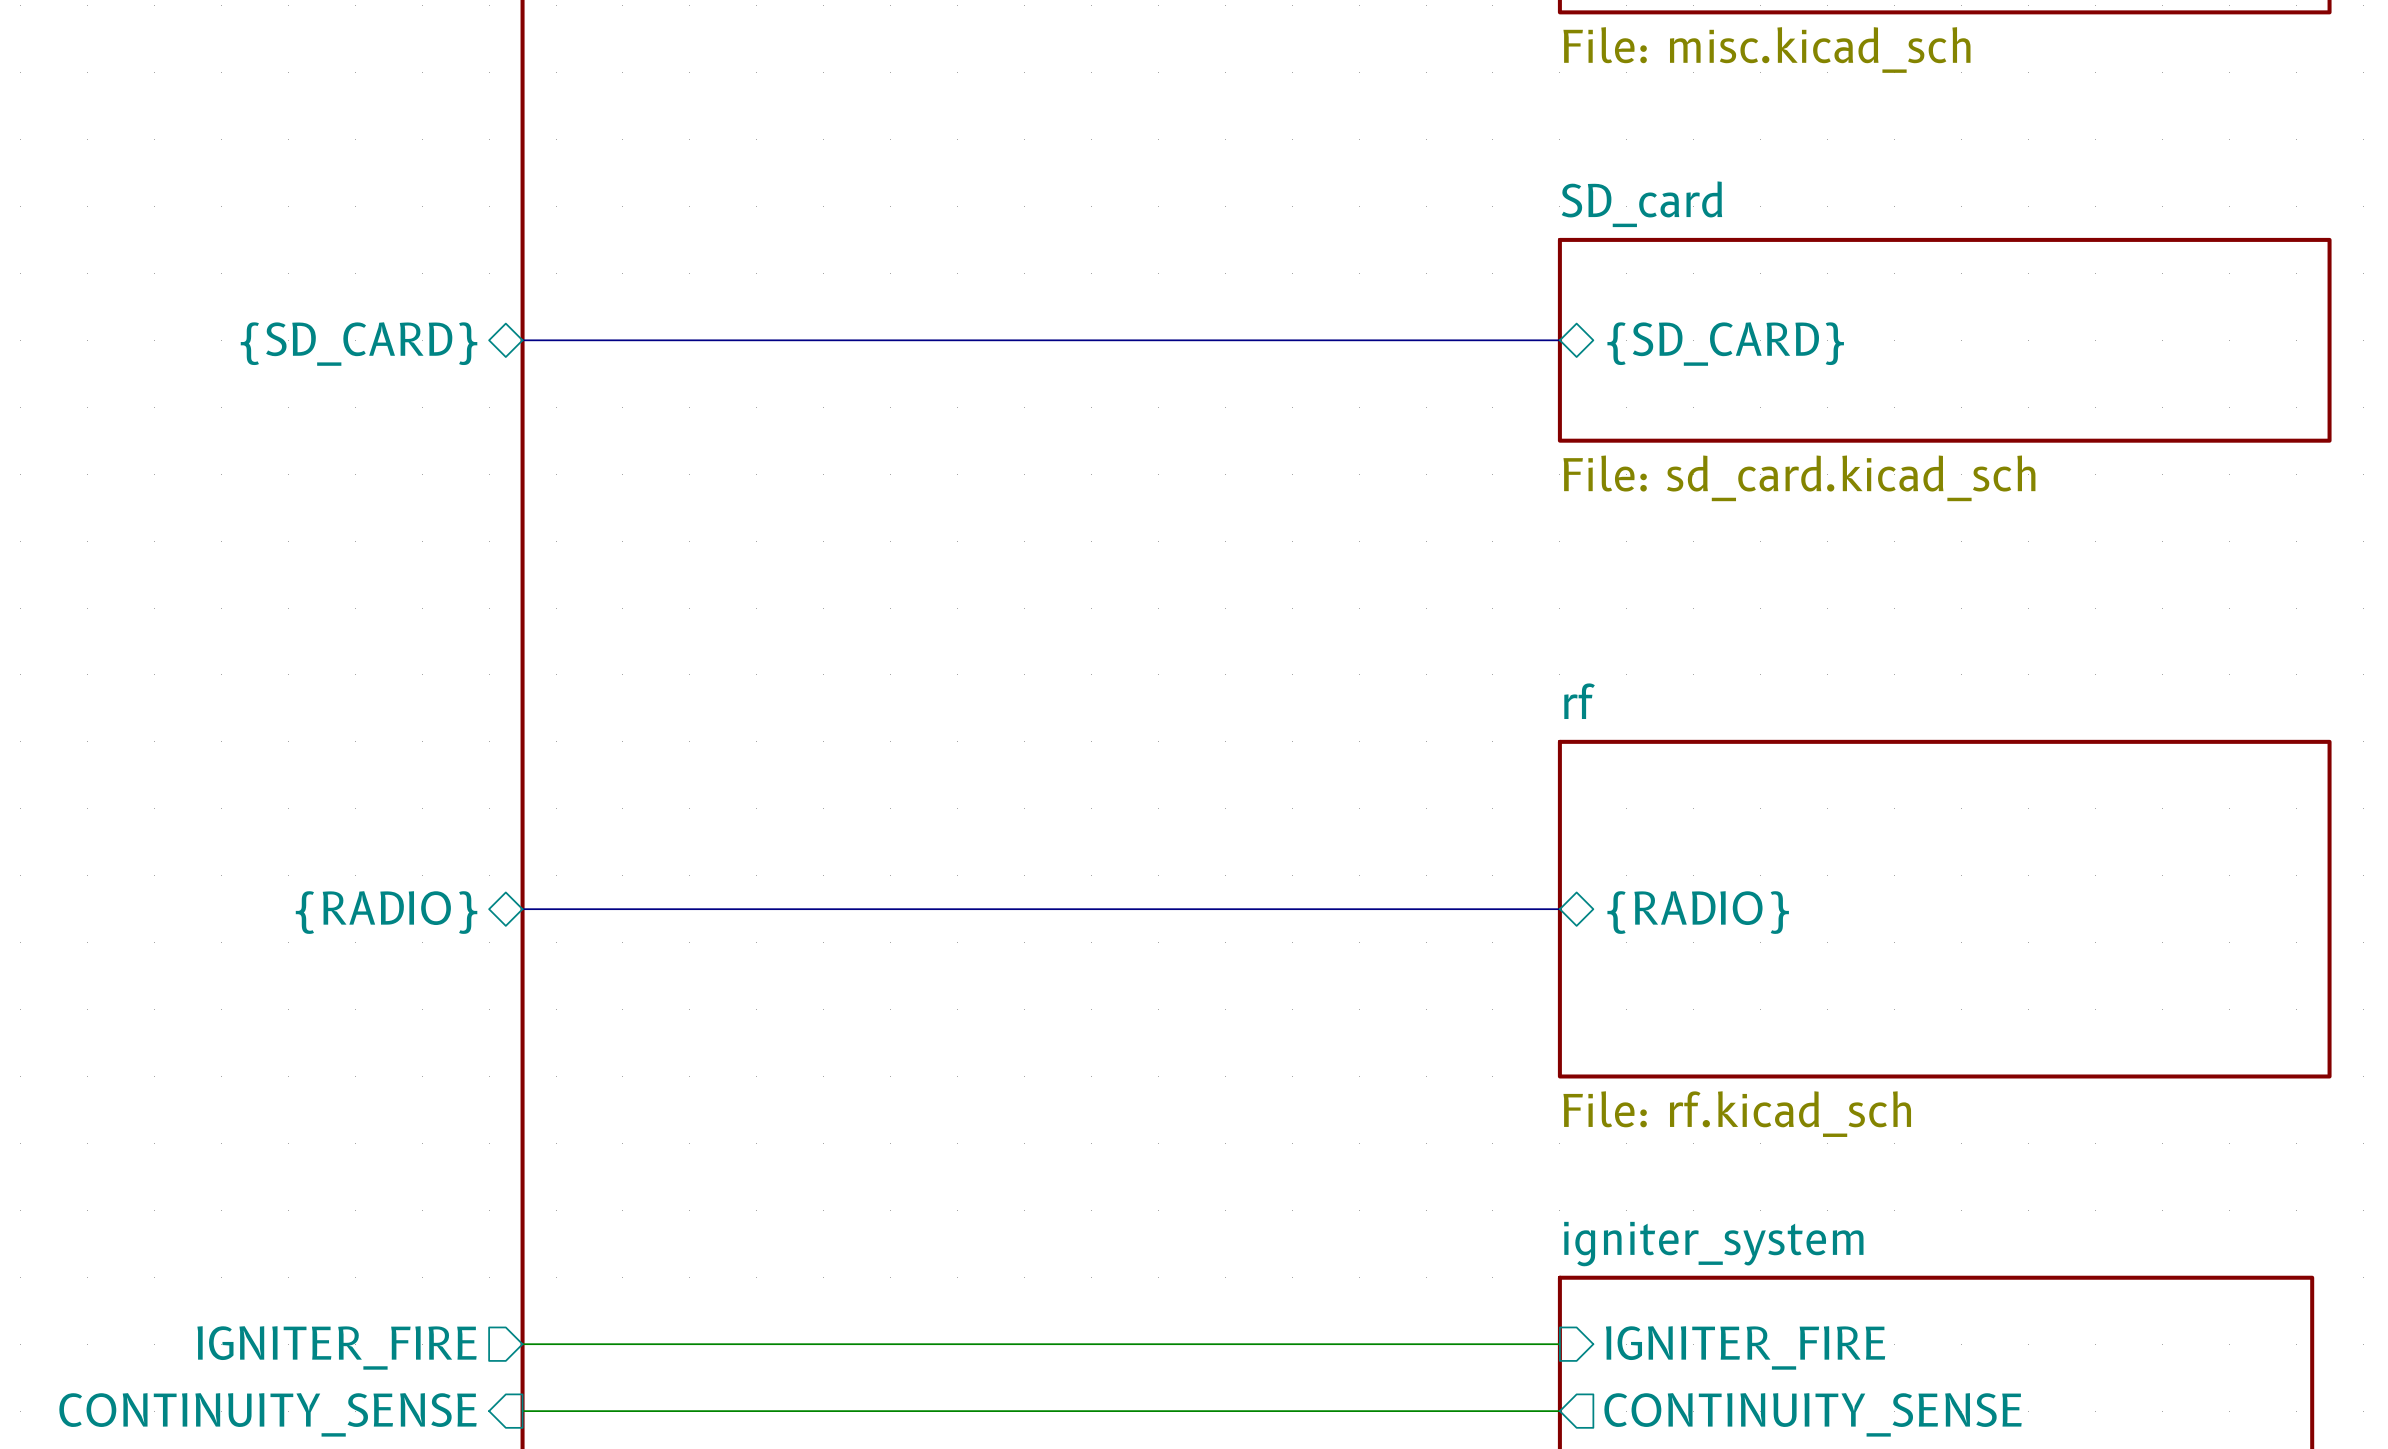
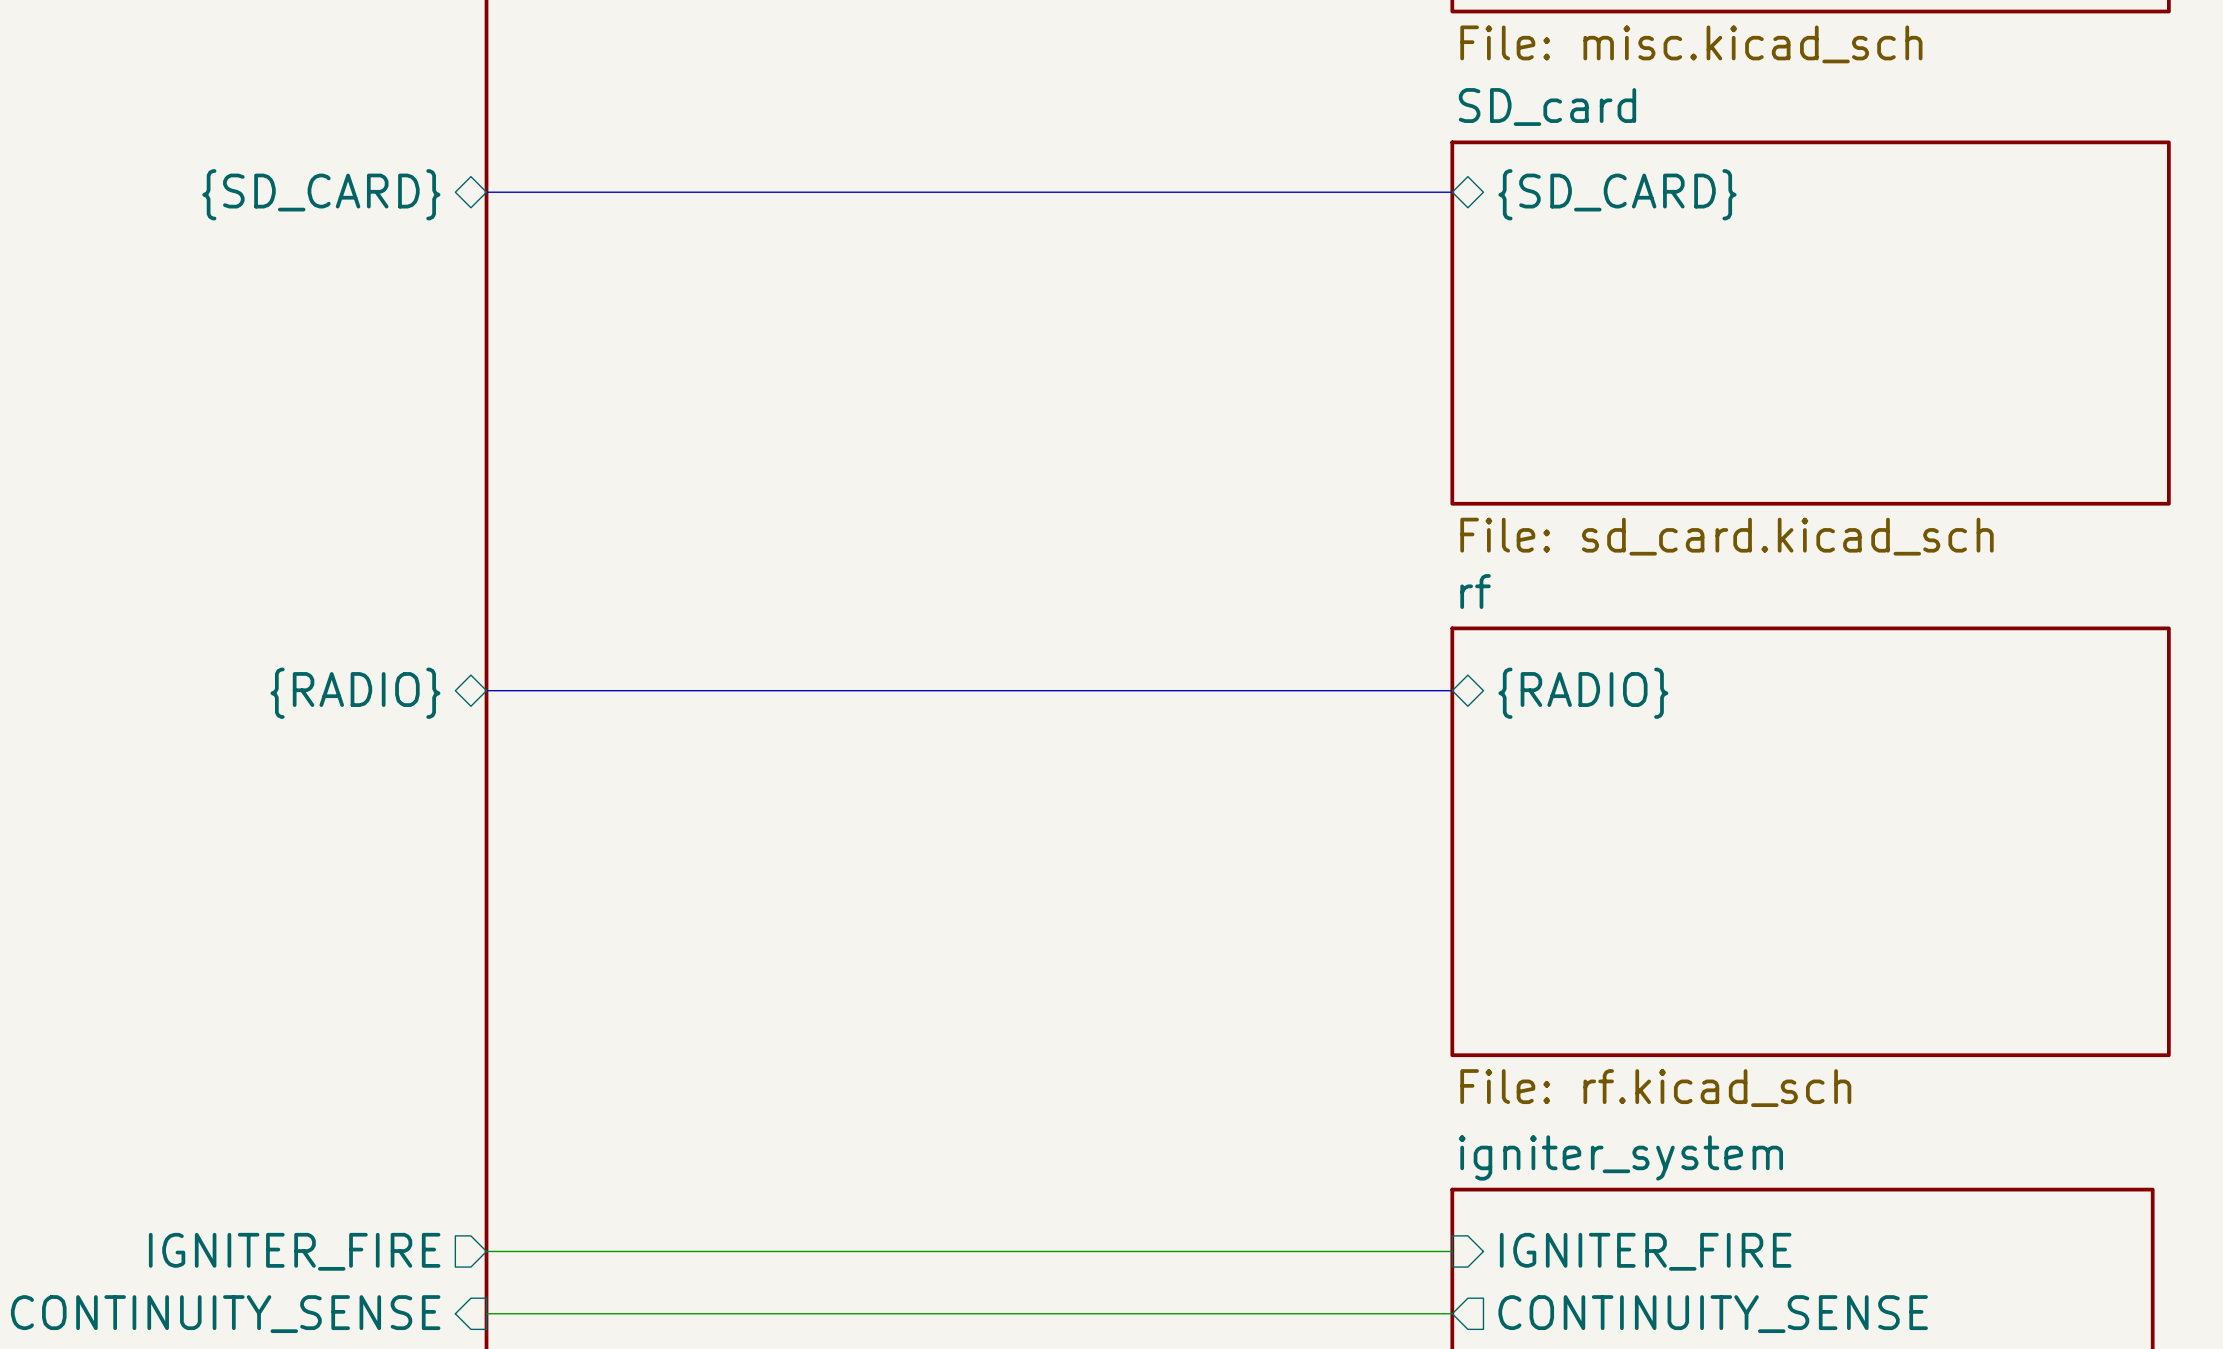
sheet SD_card name position: SD_card (1641, 204) -> SD_card (1547, 107)
sheet SD_card shape: [1557, 237, 2332, 443] -> [1450, 140, 2171, 506]
bus: (522, 340) (1559, 340) -> (486, 192) (1452, 192)
sheet pin position: {SD_CARD} (359, 344) -> {SD_CARD} (321, 194)
sheet pin position: {SD_CARD} (1725, 344) -> {SD_CARD} (1617, 194)
sheet SD_card value position: File: sd_card.kicad_sch (1799, 478) -> File: sd_card.kicad_sch (1727, 536)
sheet rf name position: rf (1579, 701) -> rf (1475, 591)
sheet rf shape: [1557, 739, 2332, 1079] -> [1450, 626, 2171, 1058]
bus: (522, 909) (1559, 909) -> (486, 690) (1452, 690)
sheet pin position: {RADIO} (386, 912) -> {RADIO} (355, 693)
sheet pin position: {RADIO} (1698, 912) -> {RADIO} (1583, 693)
sheet rf value position: File: rf.kicad_sch (1737, 1114) -> File: rf.kicad_sch (1655, 1088)

